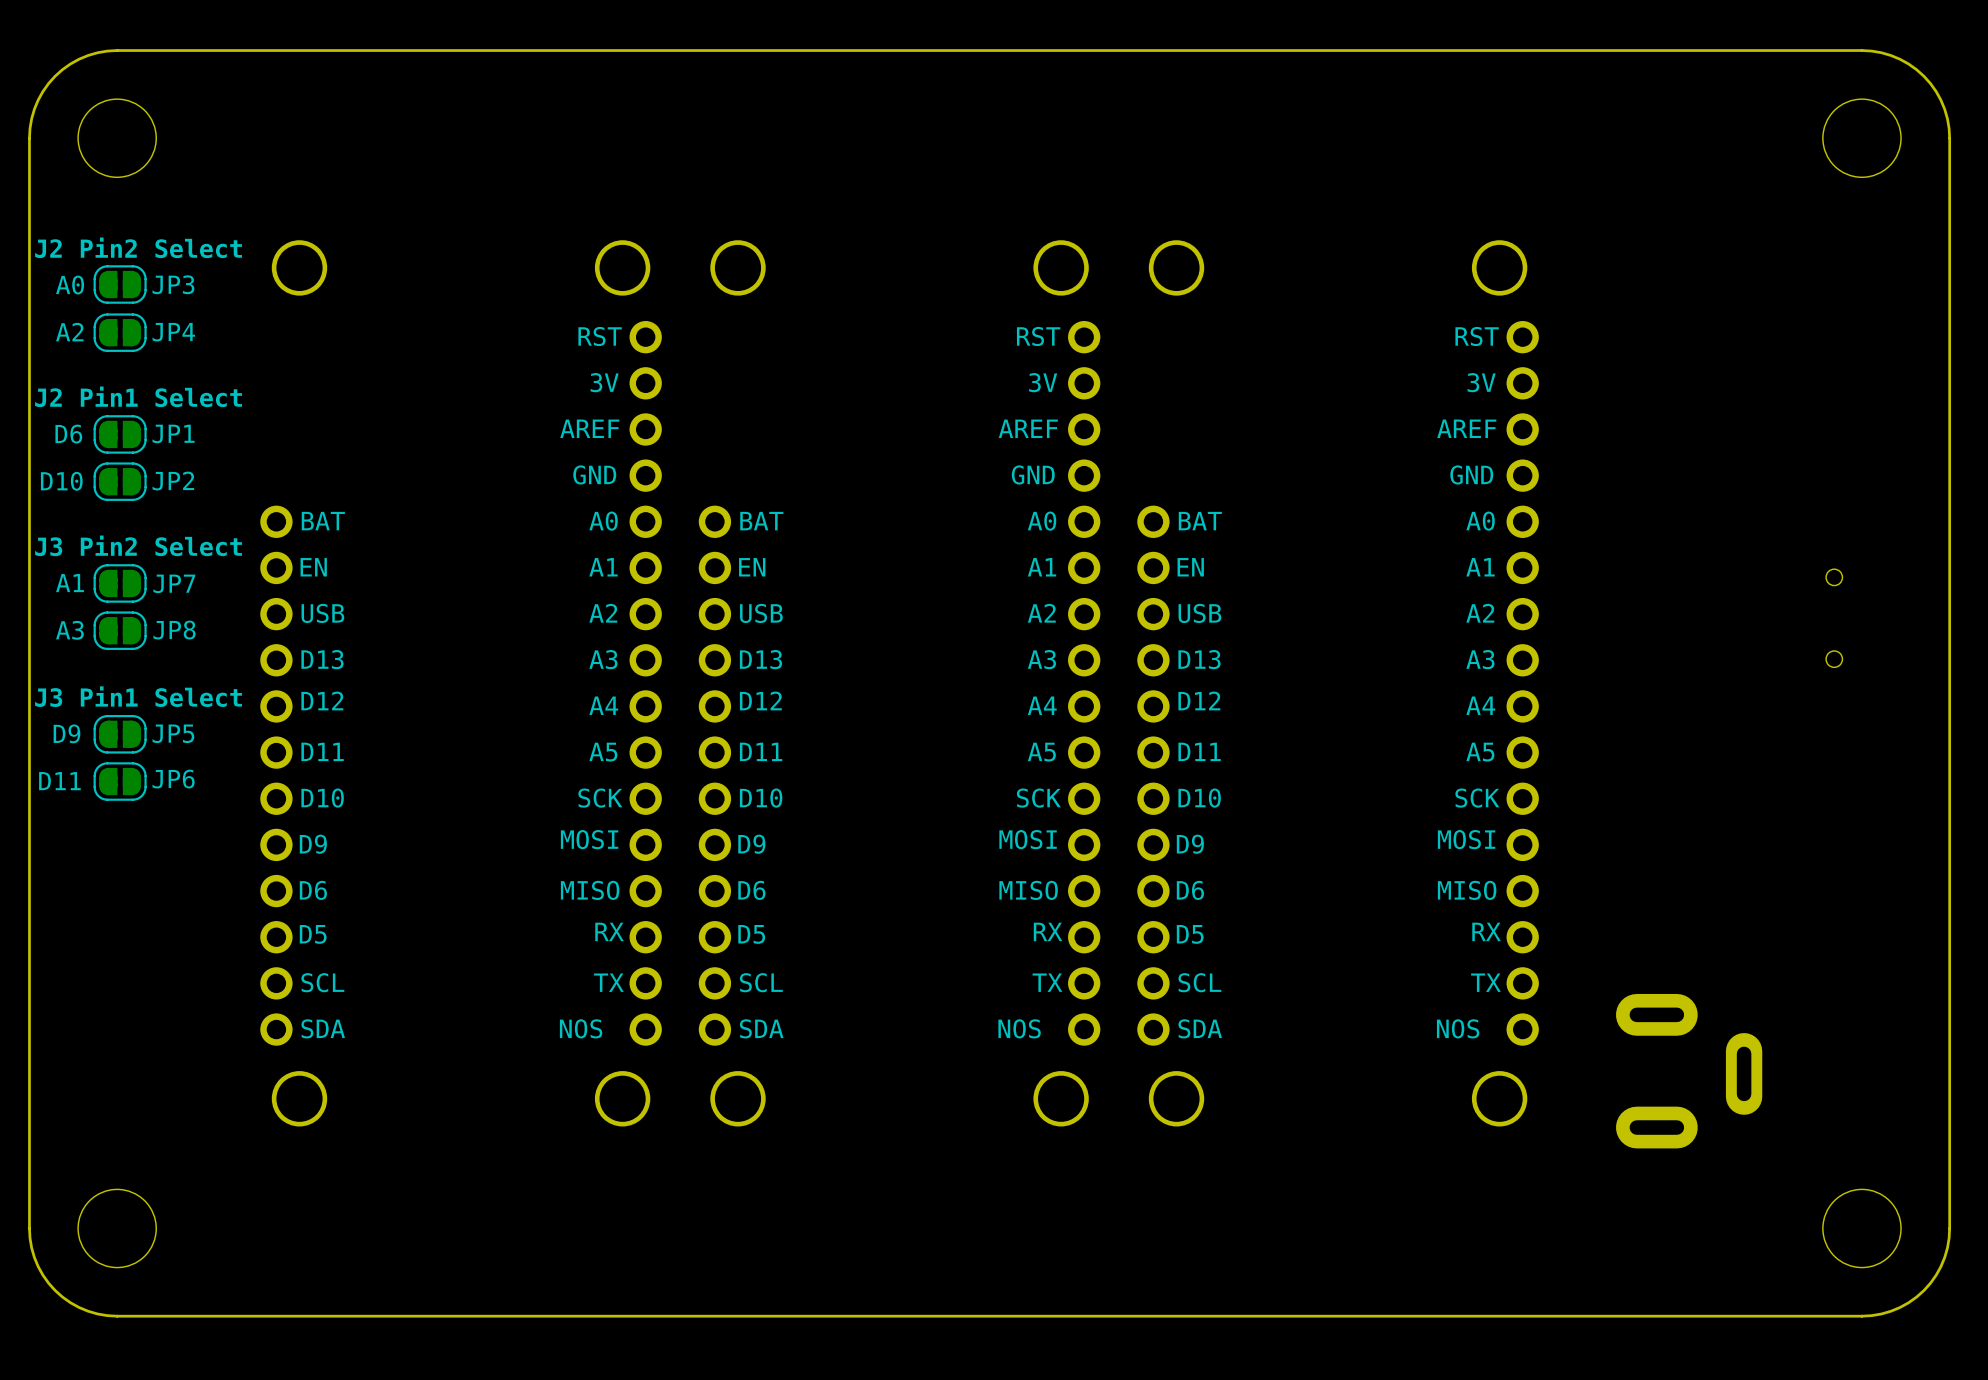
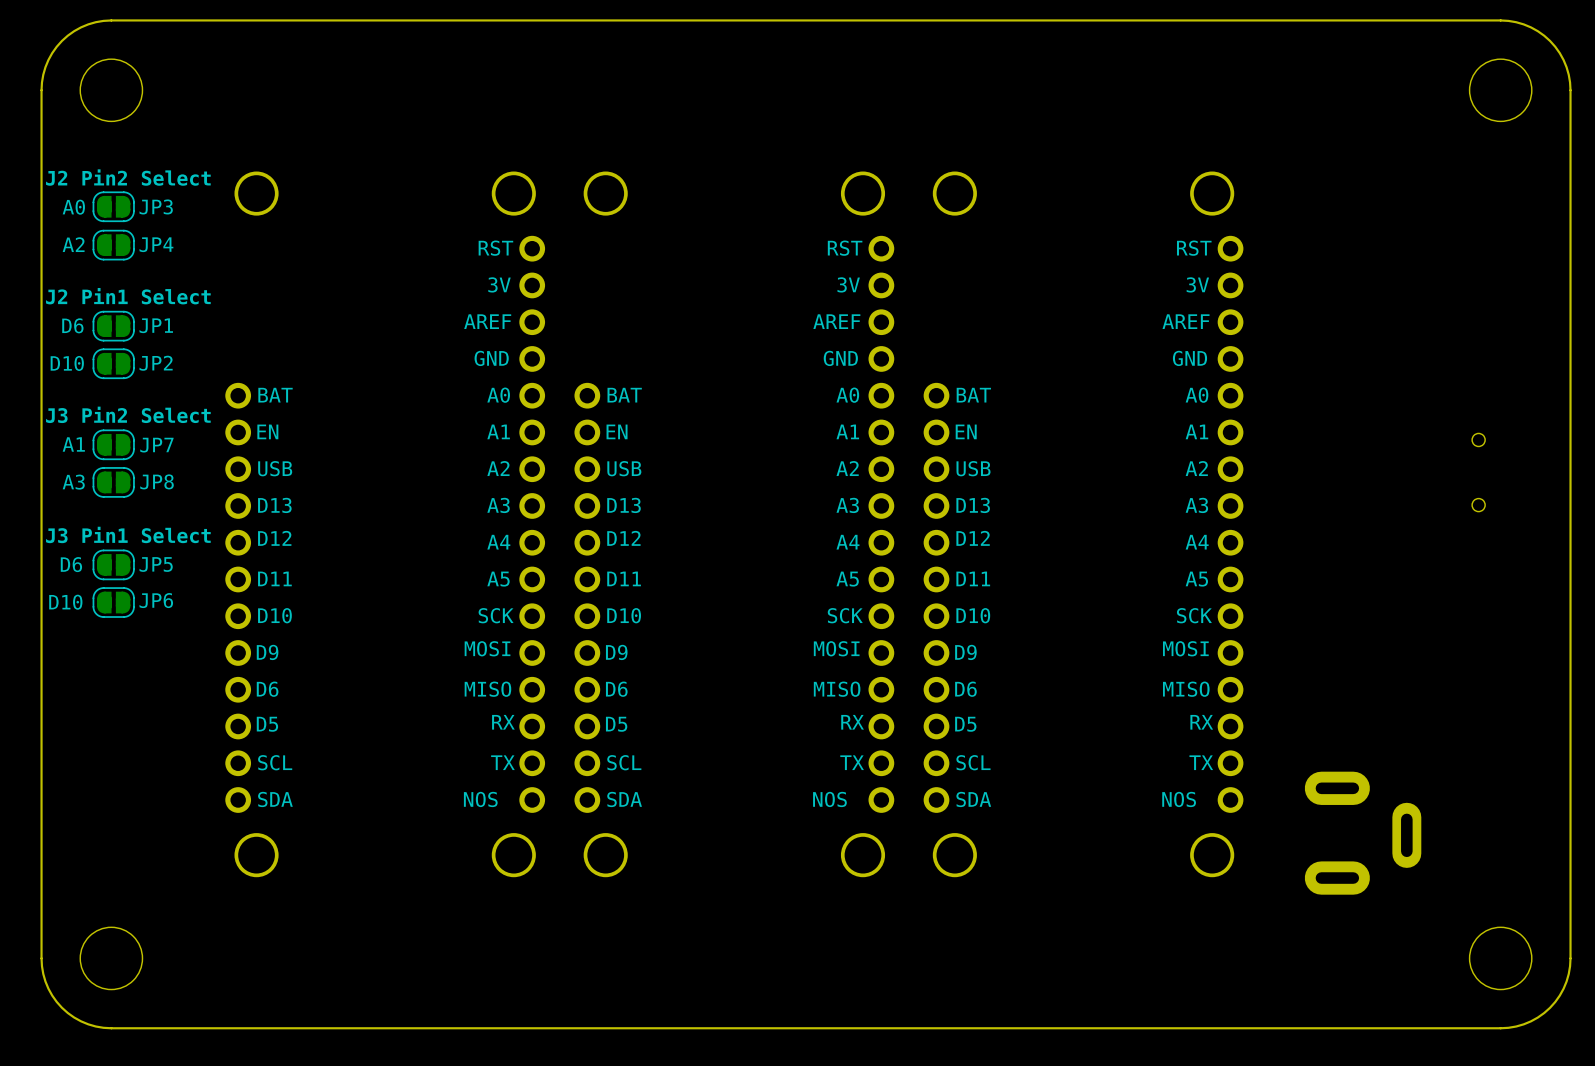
text: D9 (66, 733) -> D6 (71, 564)
text: D11 (59, 781) -> D10 (65, 602)

